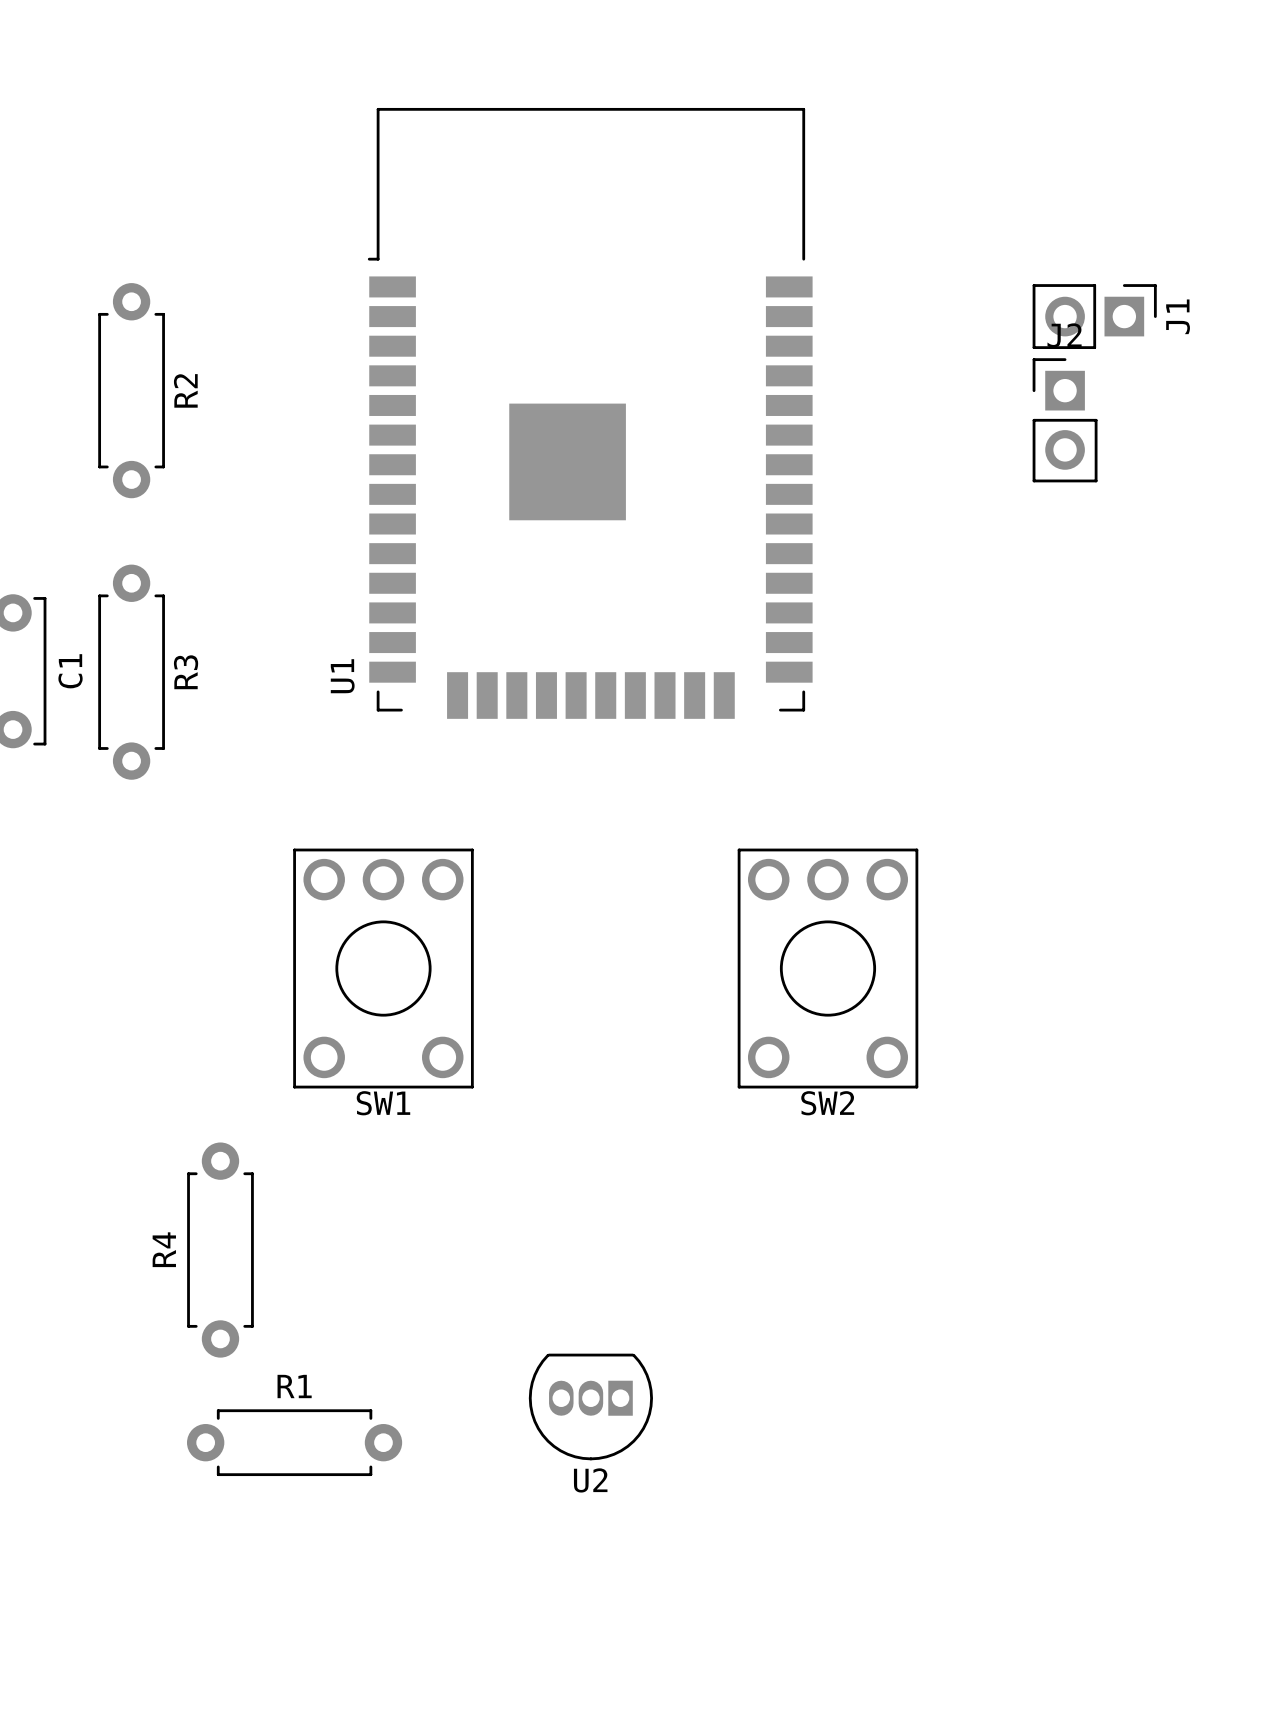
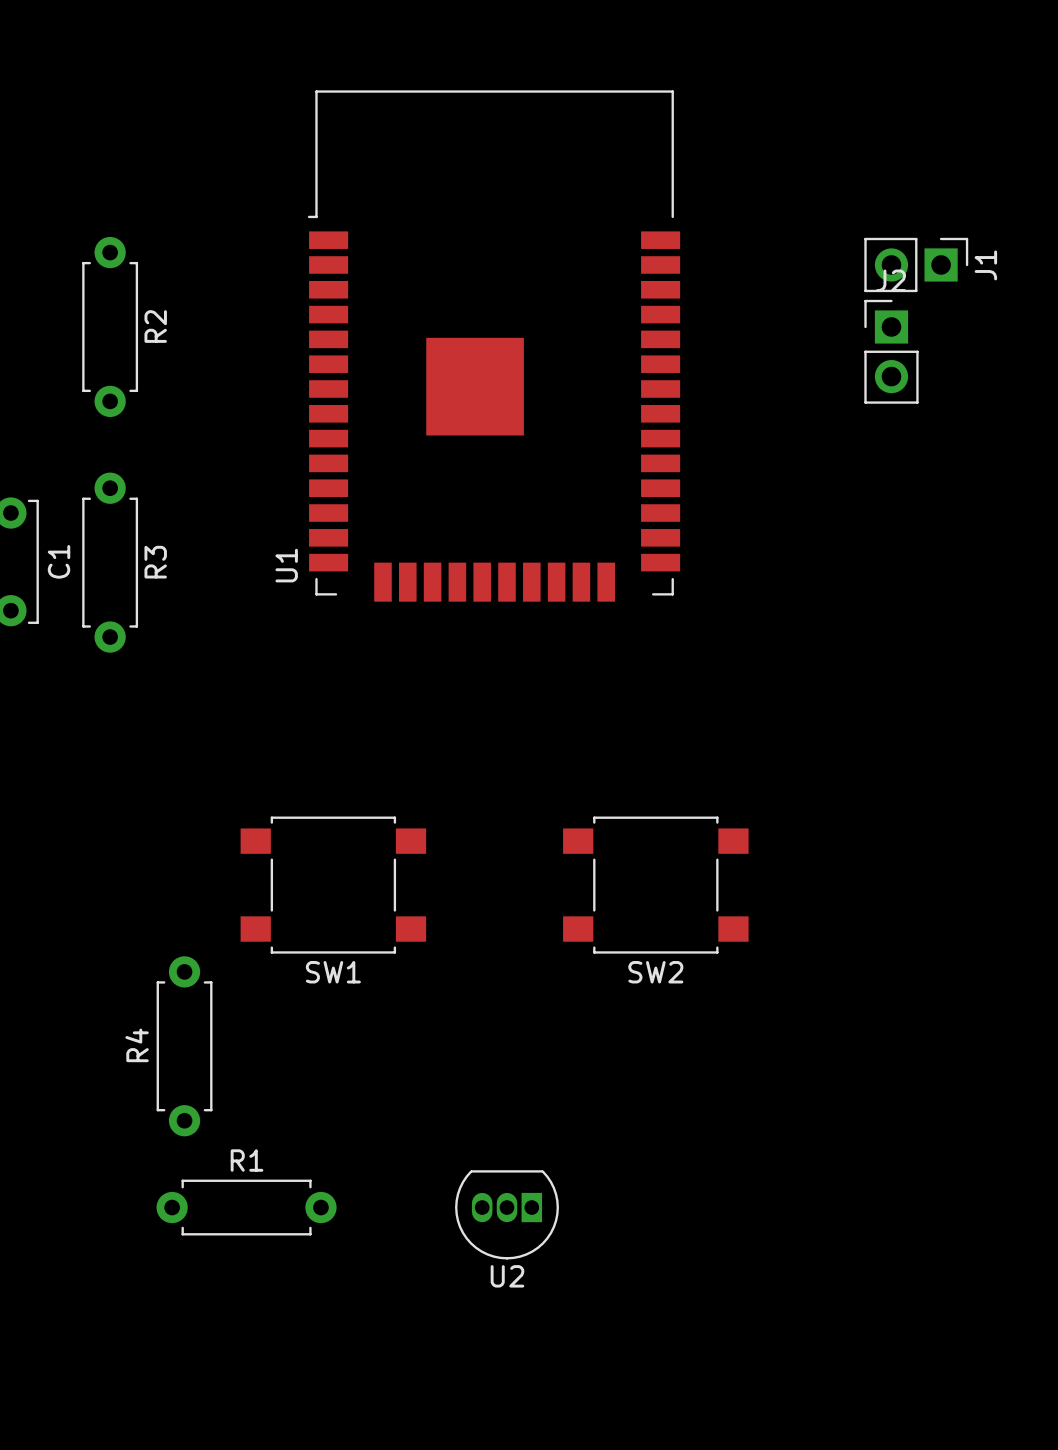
SW1 footprint: [293, 848, 474, 1089] -> [240, 816, 427, 954]
SW2 footprint: [737, 848, 919, 1089] -> [563, 816, 749, 954]
U2 position: (590, 1406) -> (507, 1214)

